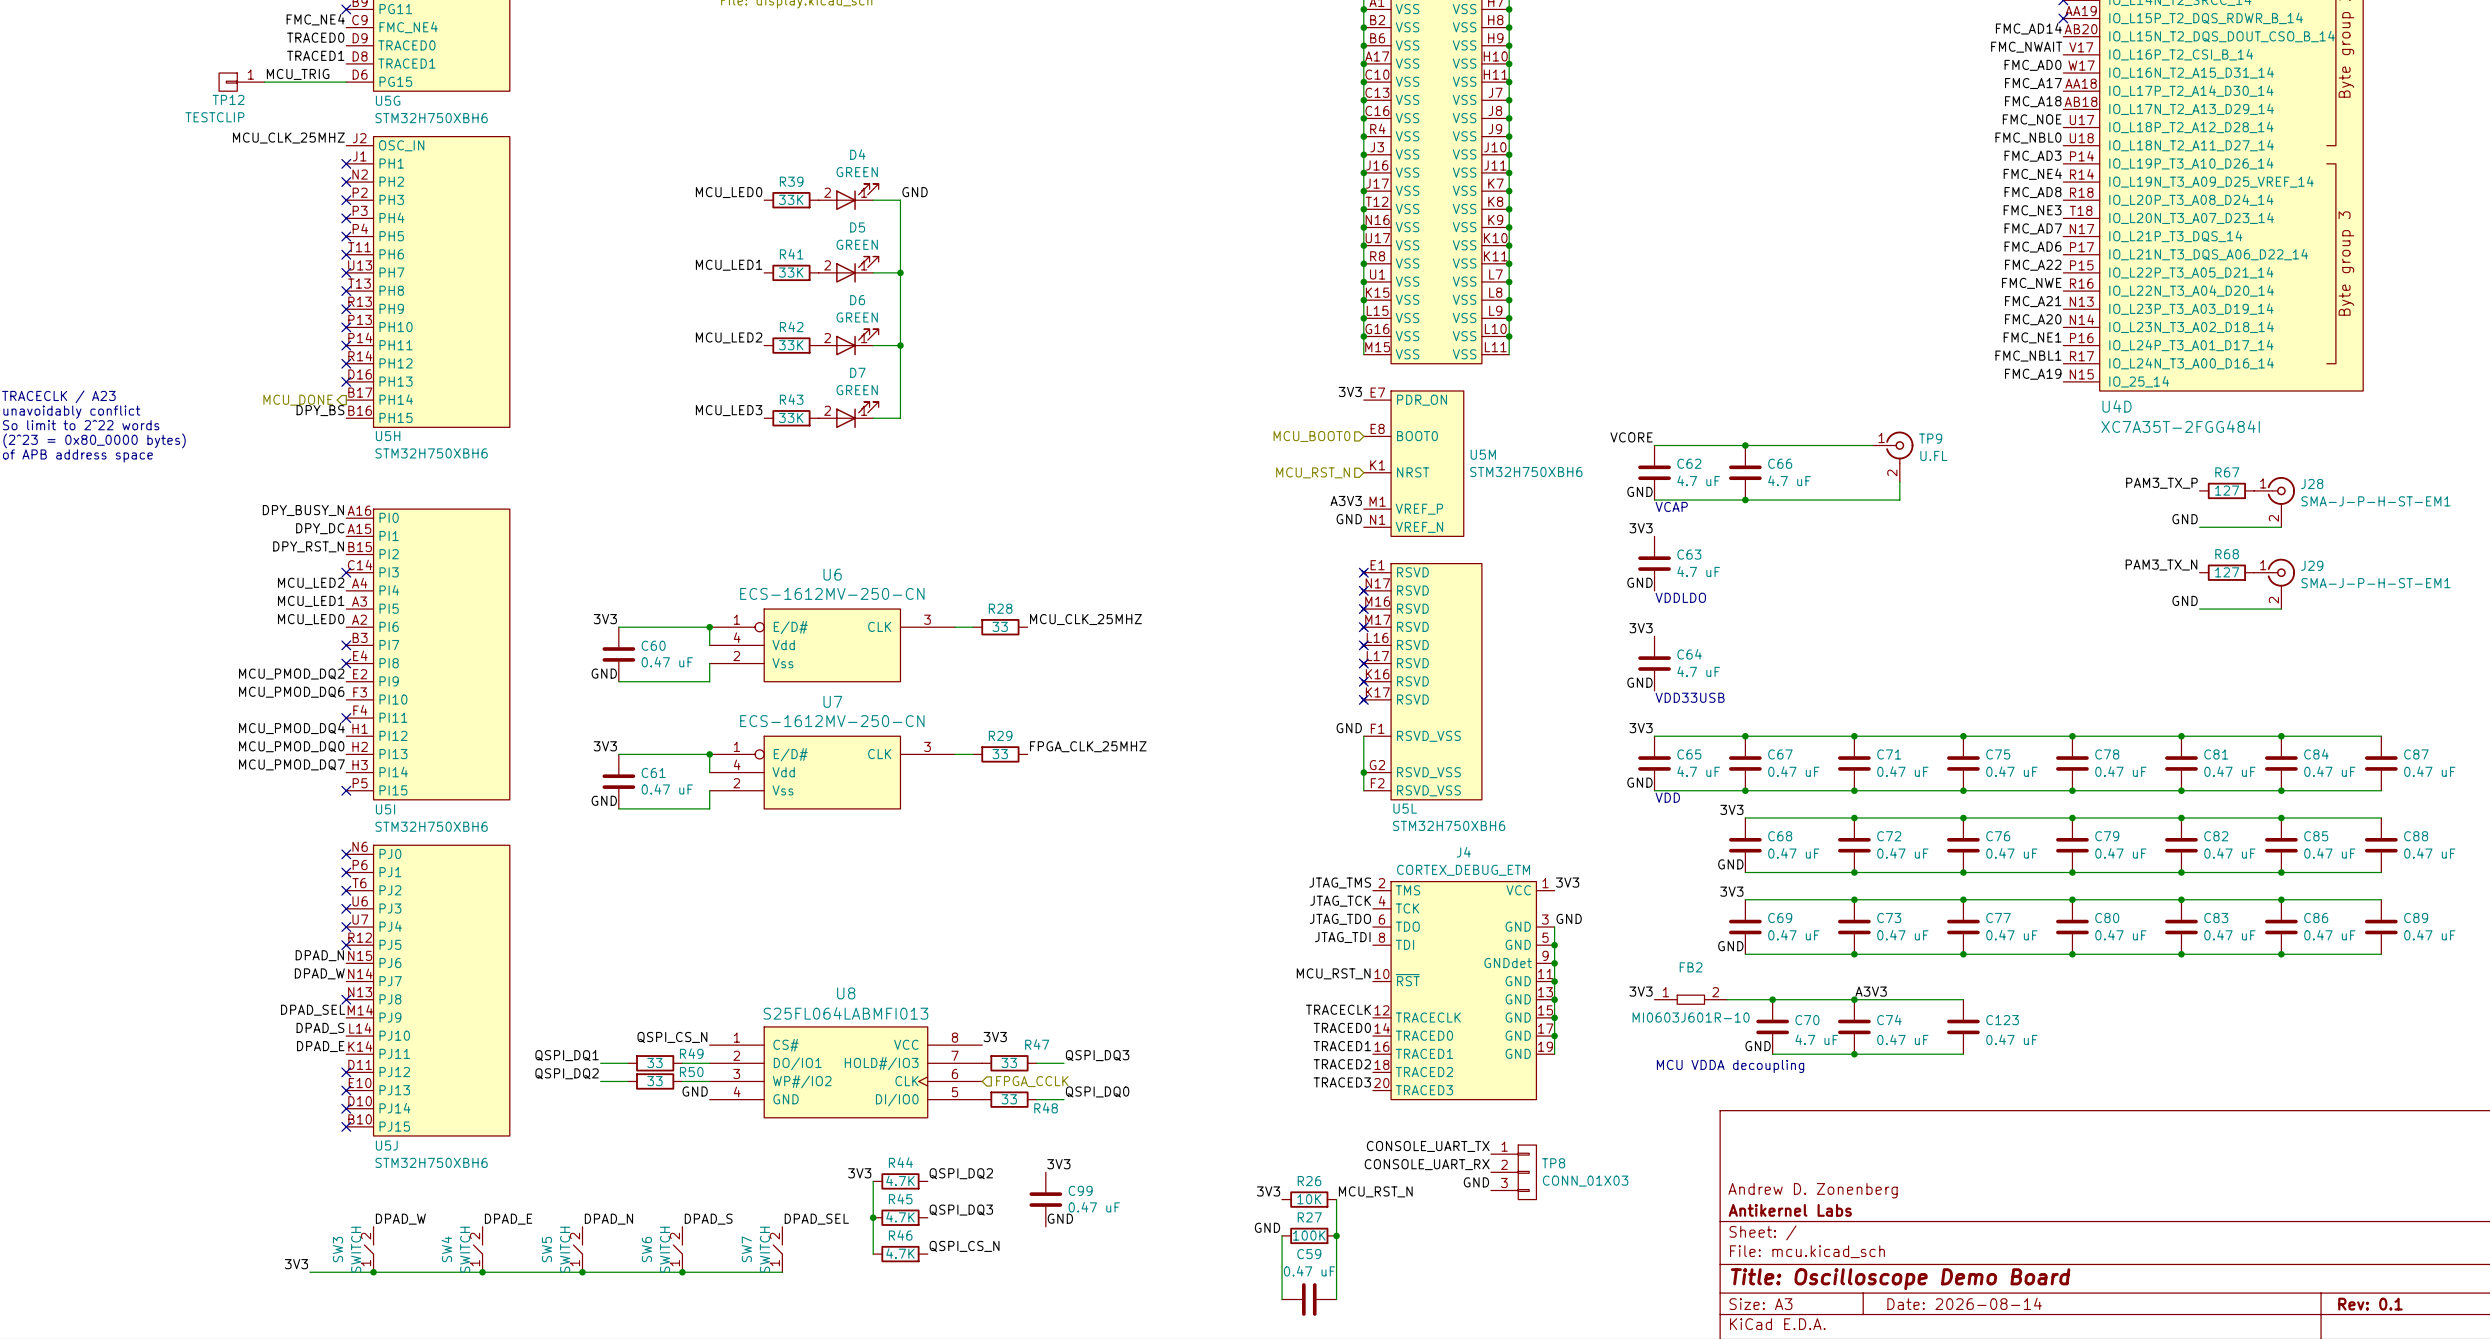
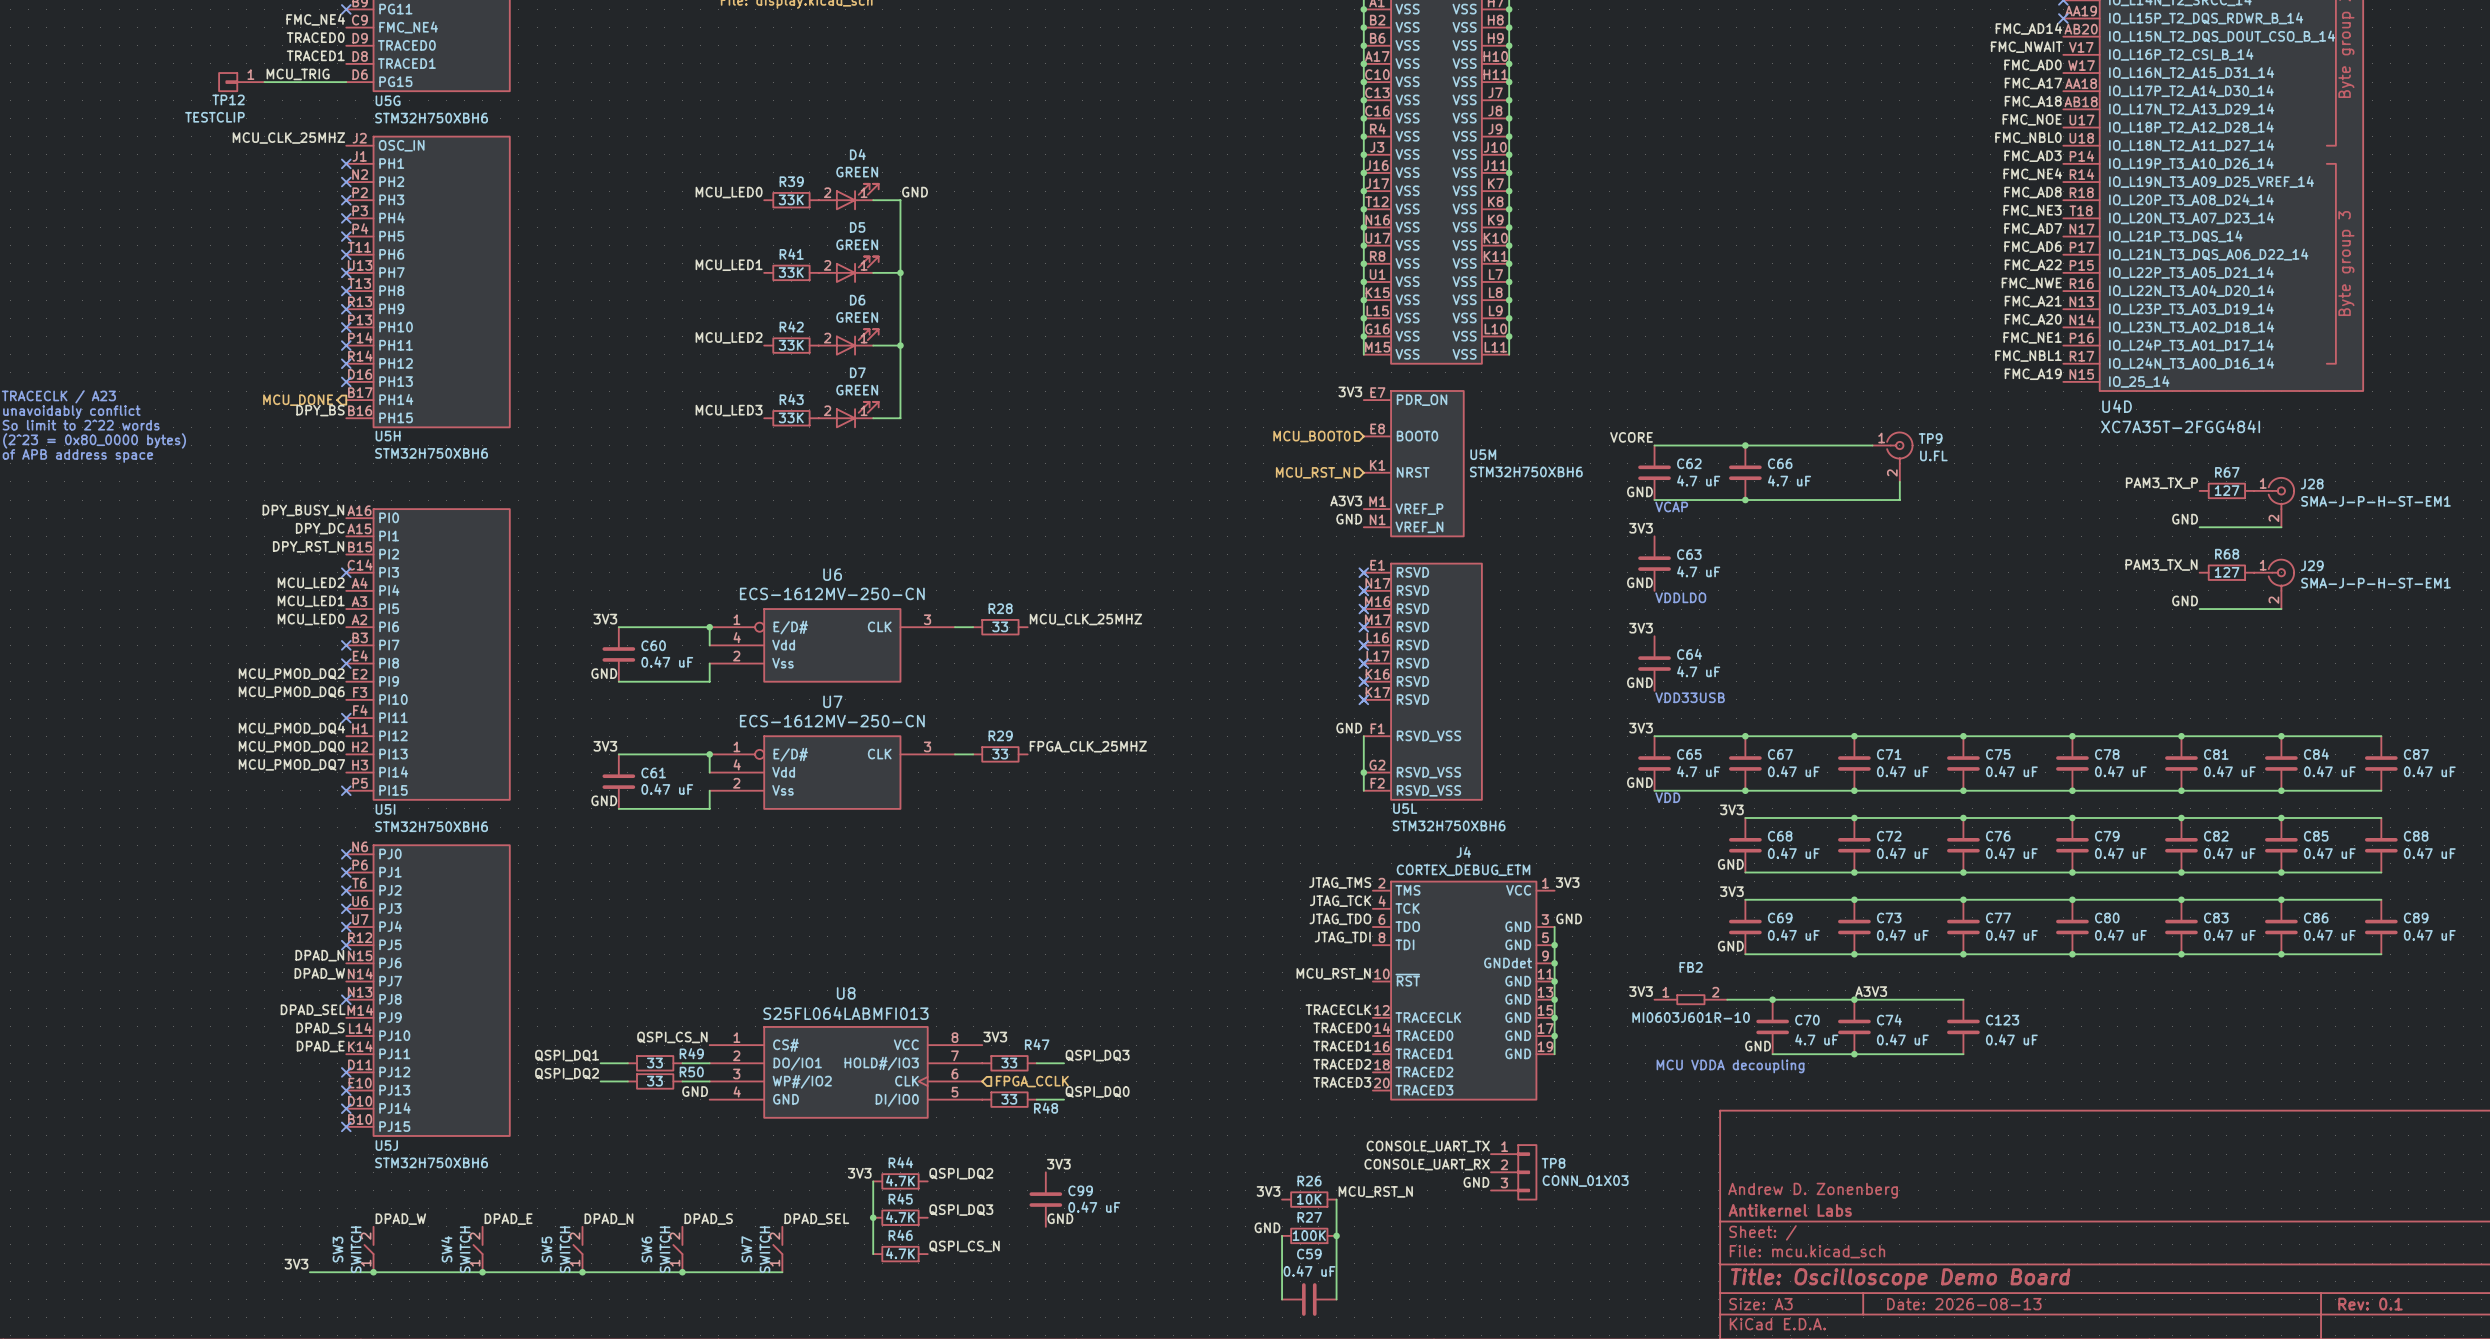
title block: Date: 2026-08-14 (1964, 1303) -> Date: 2026-08-13 (1964, 1304)

